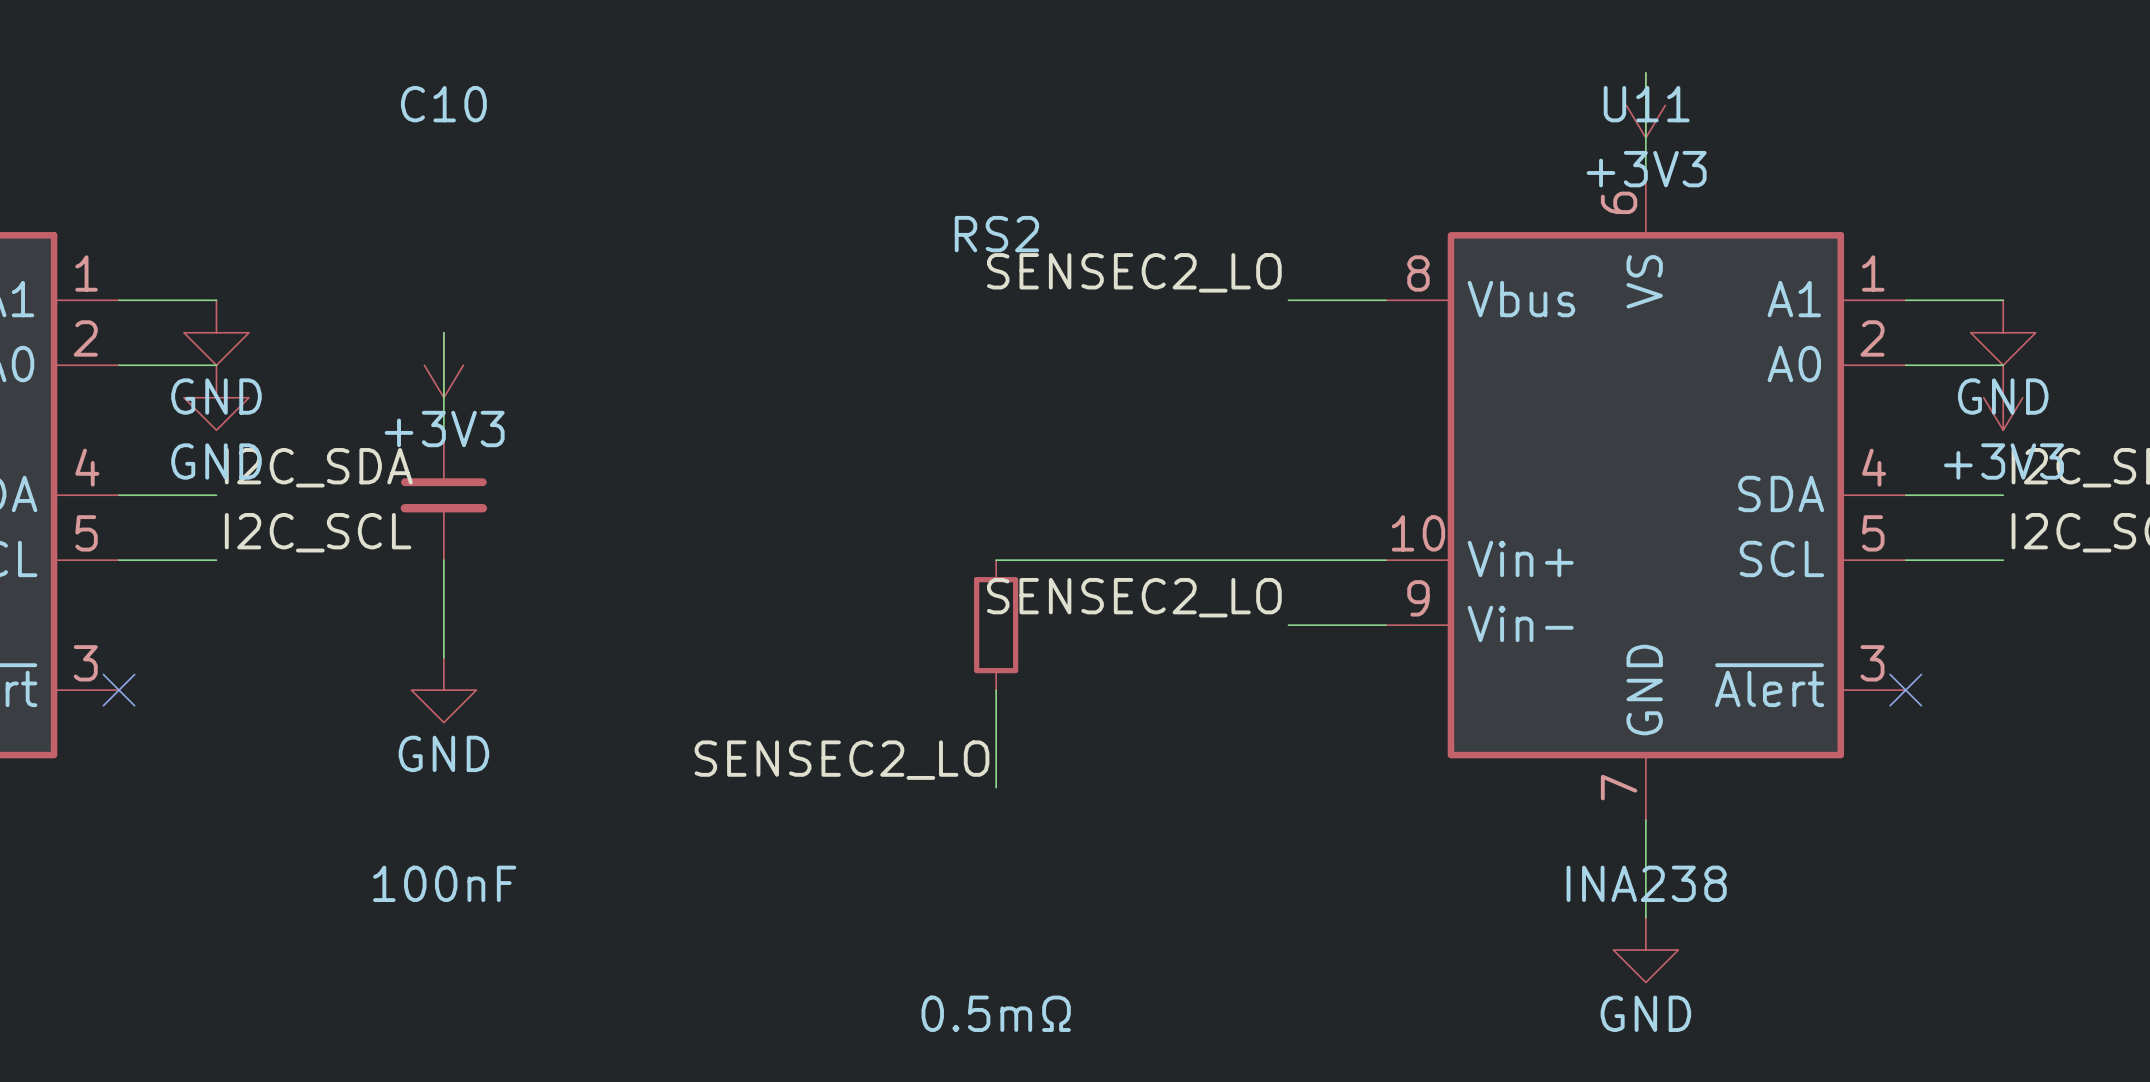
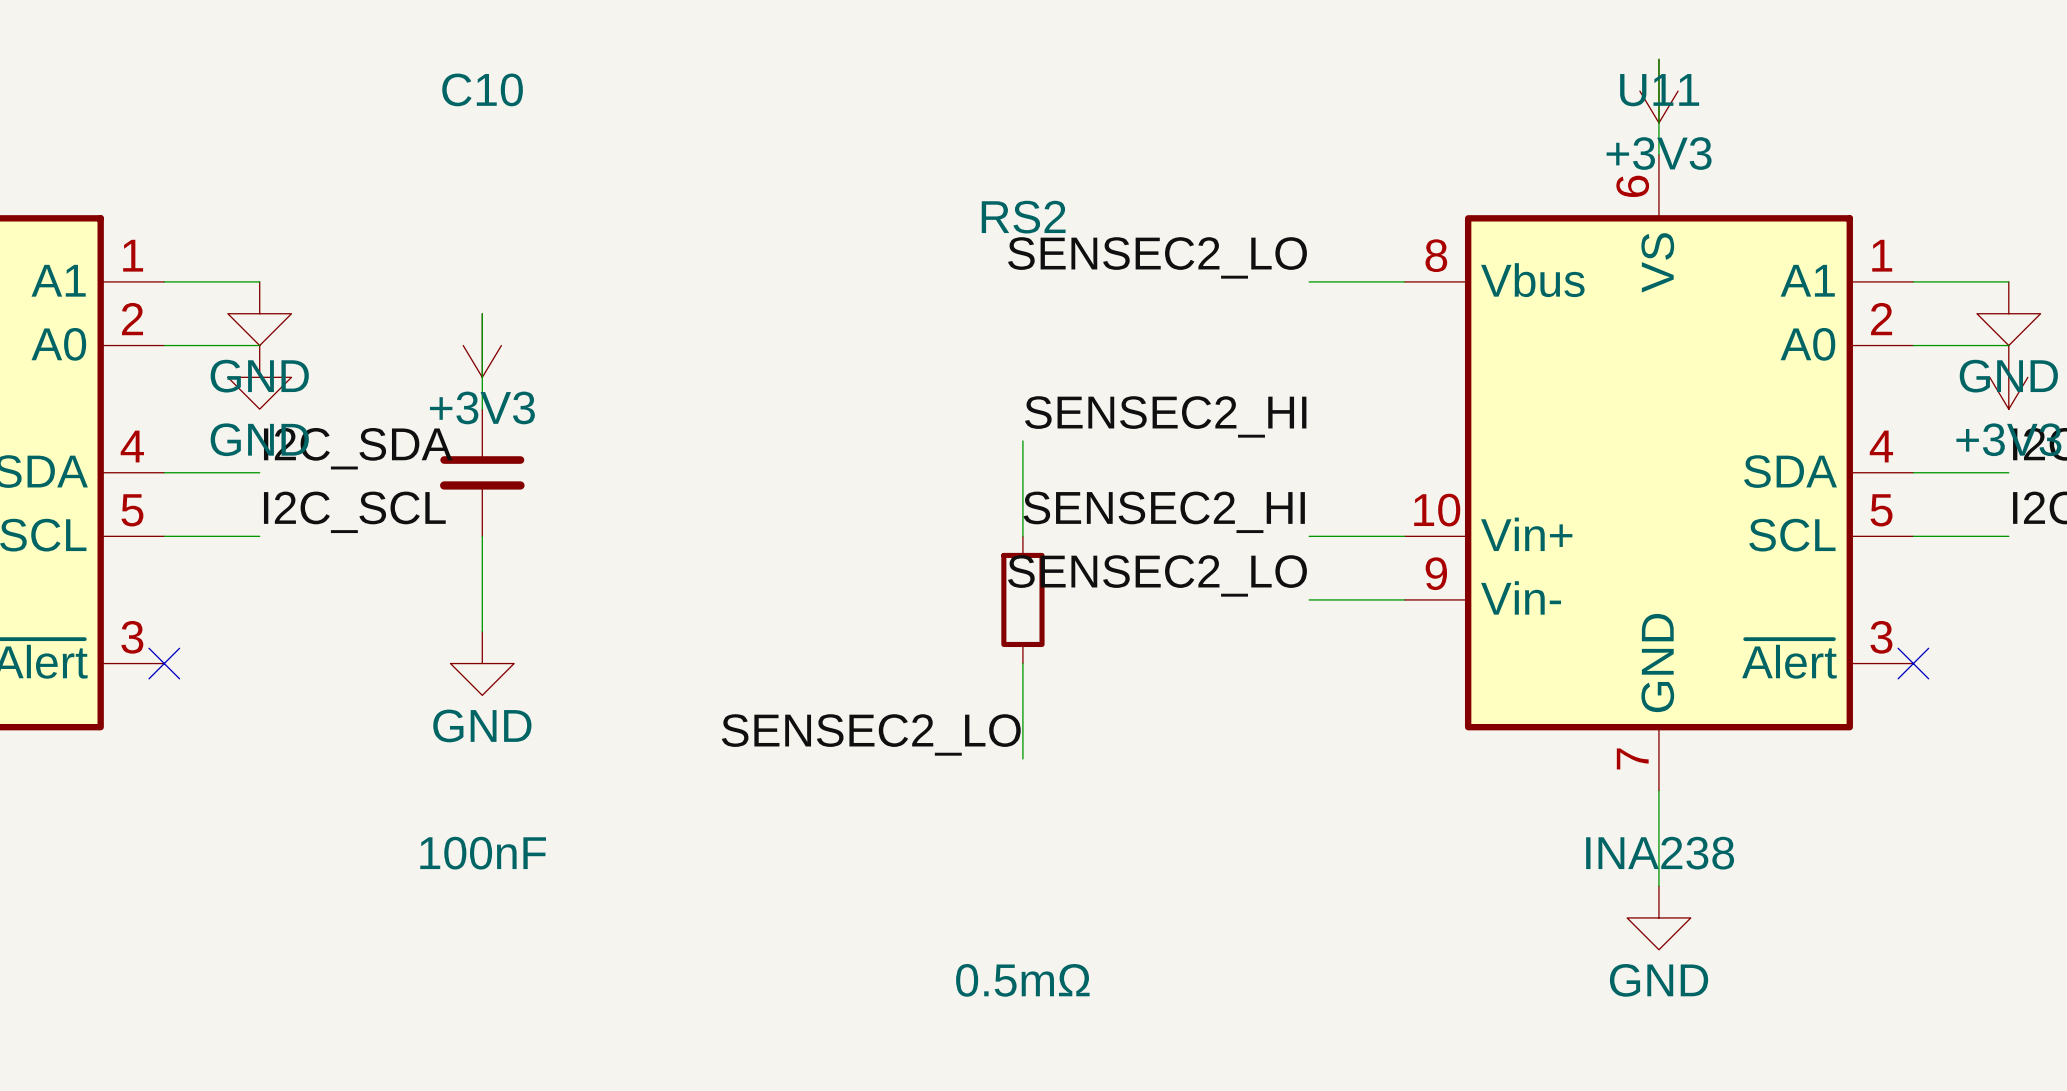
label: none -> SENSEC2_HI (1165, 416)
label: none -> SENSEC2_HI (1164, 512)
wire: (996, 560) (1288, 560) -> (1022, 536) (1022, 440)

